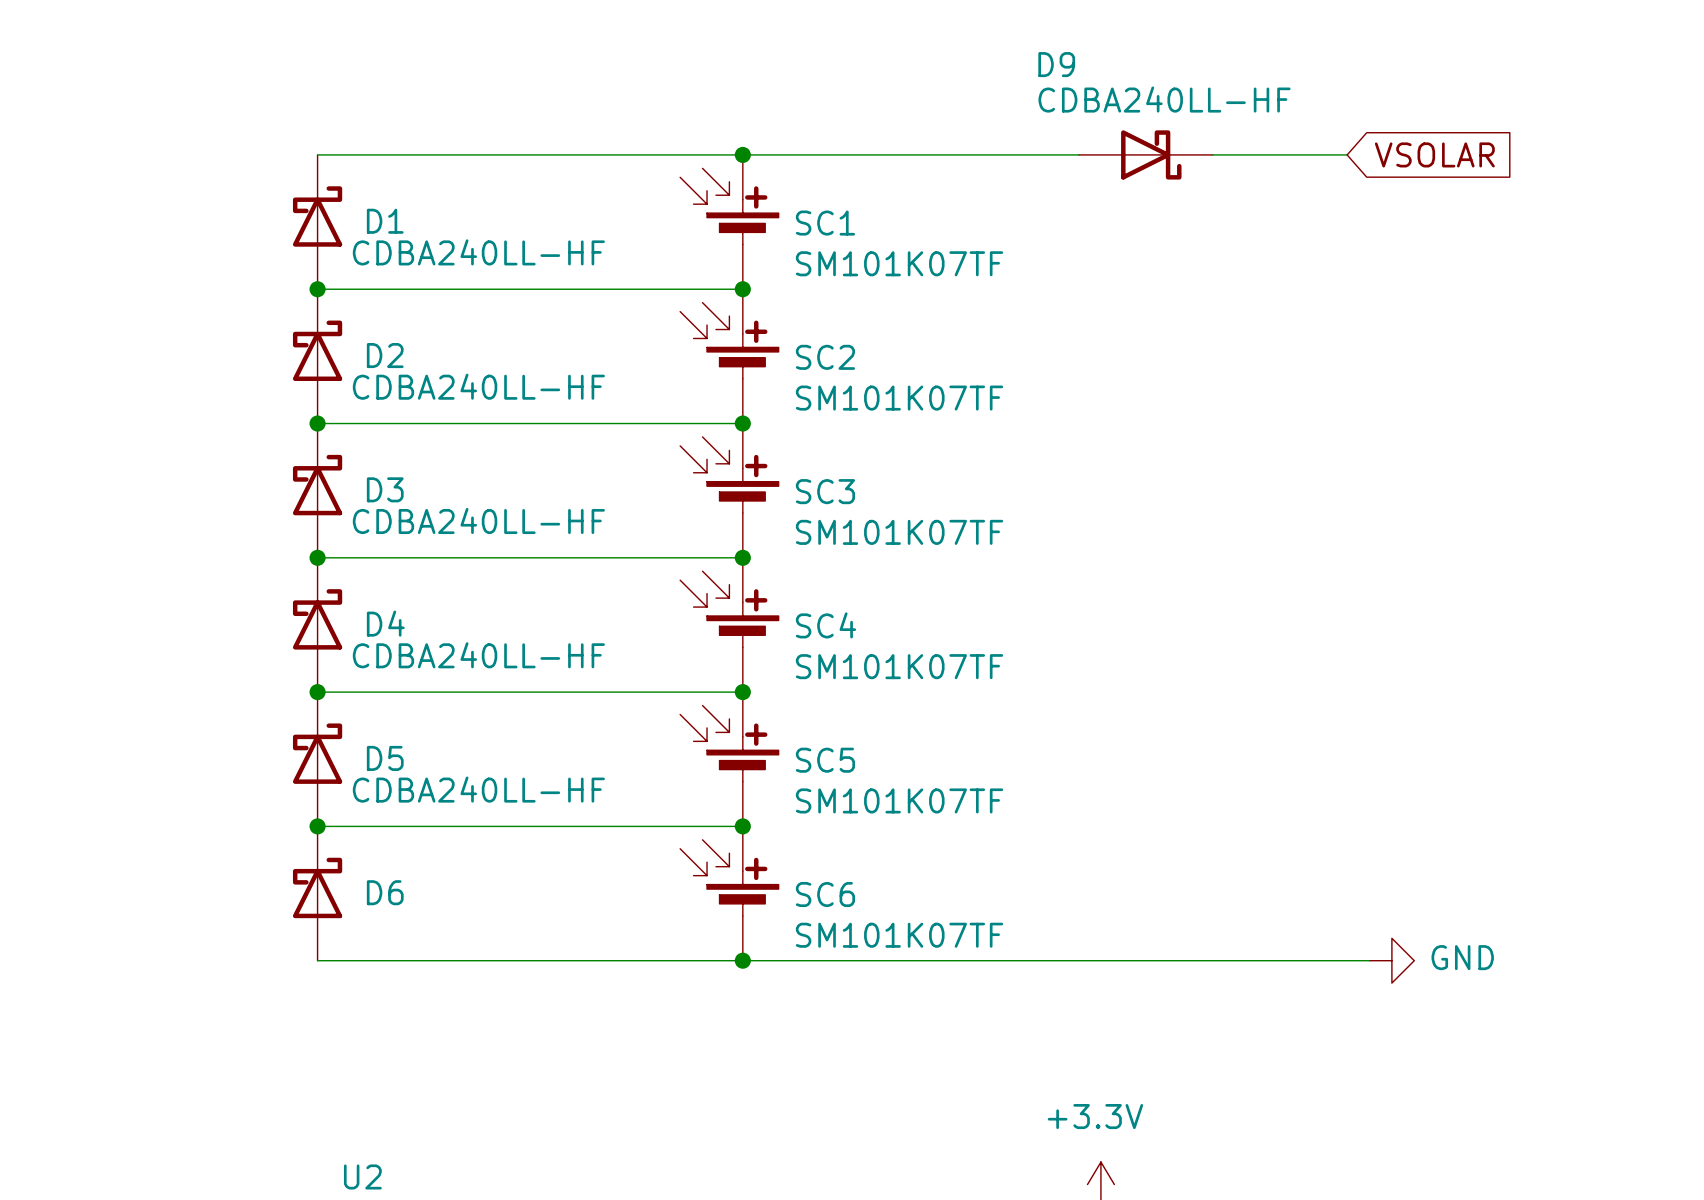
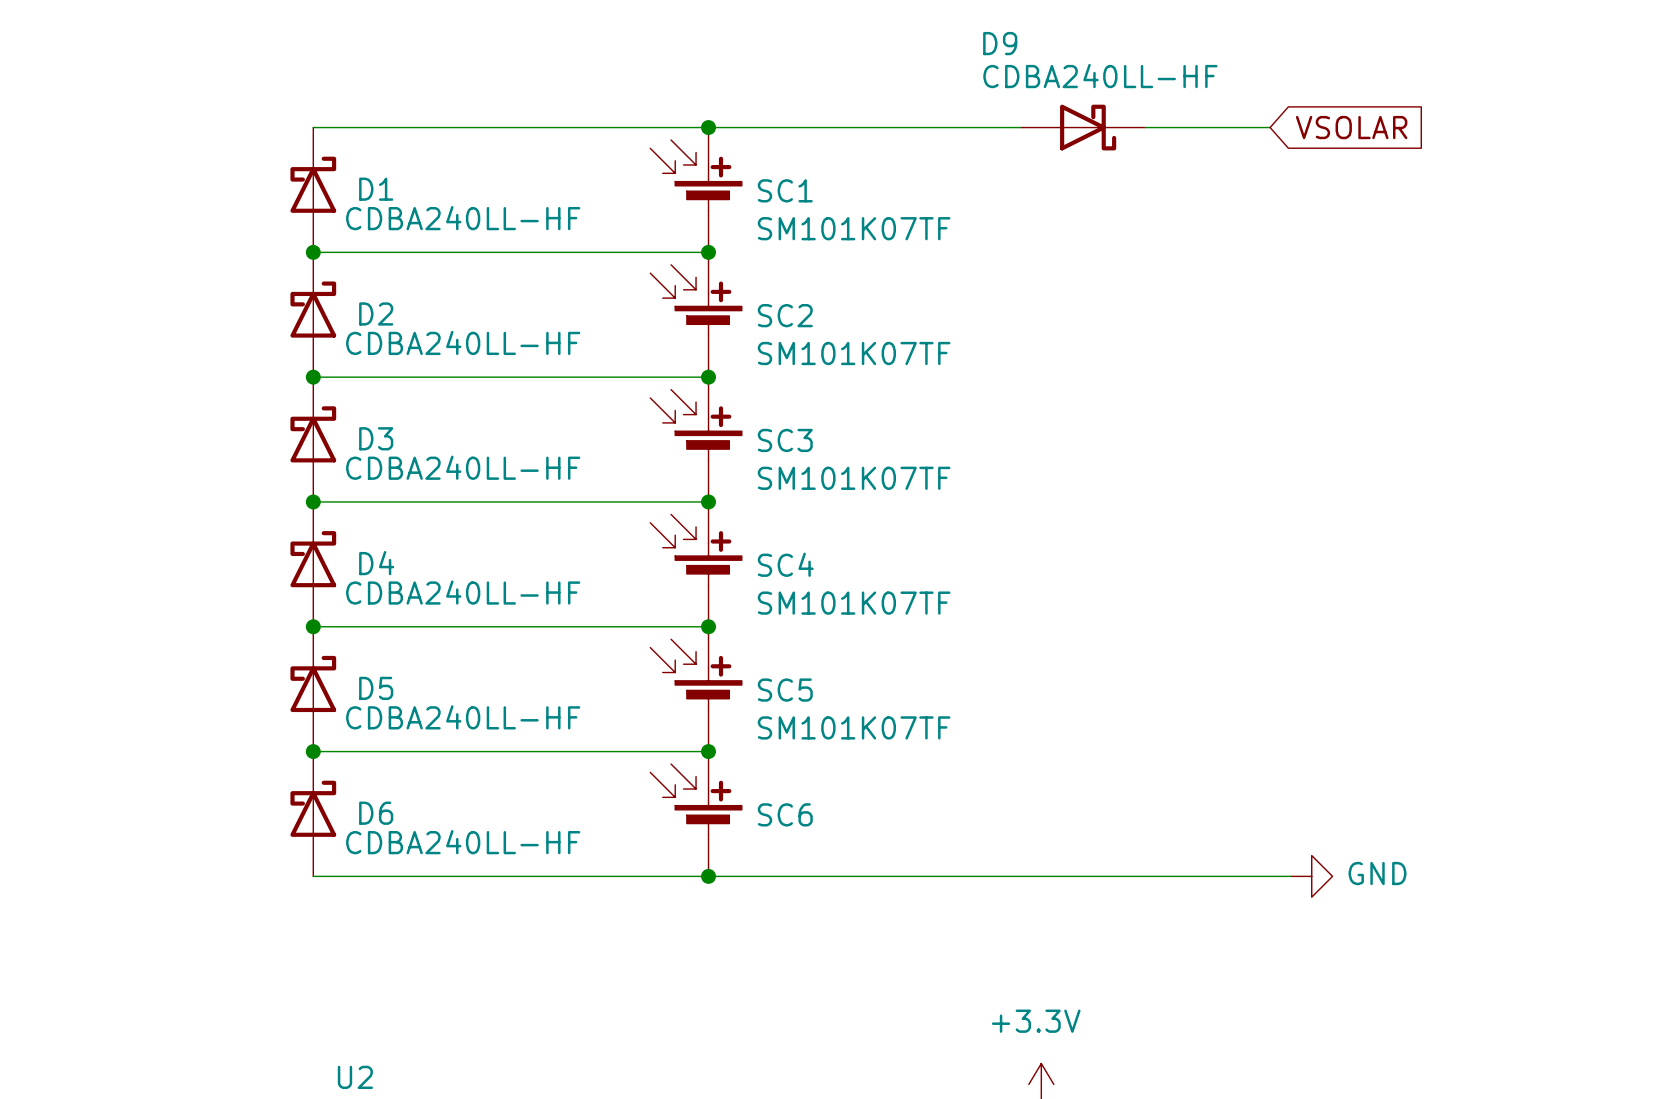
D6 value: none -> CDBA240LL-HF (463, 842)
SC6 value: SM101K07TF (899, 935) -> none

